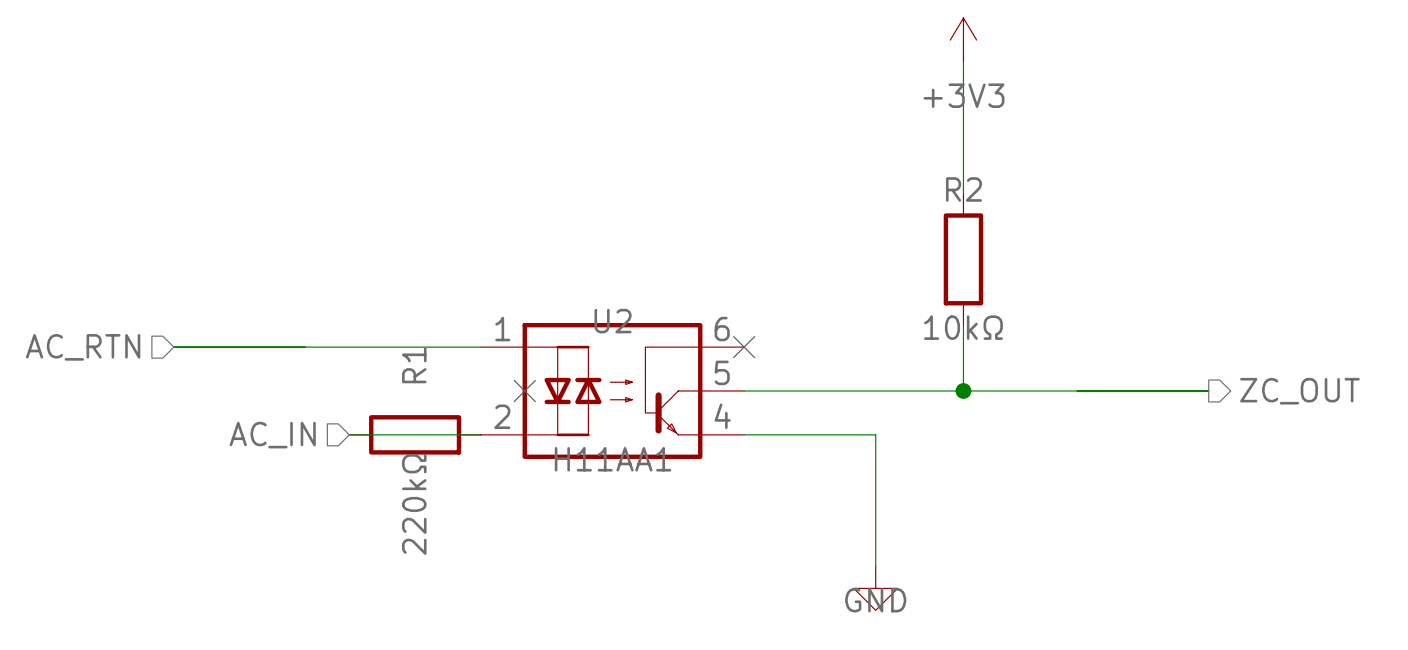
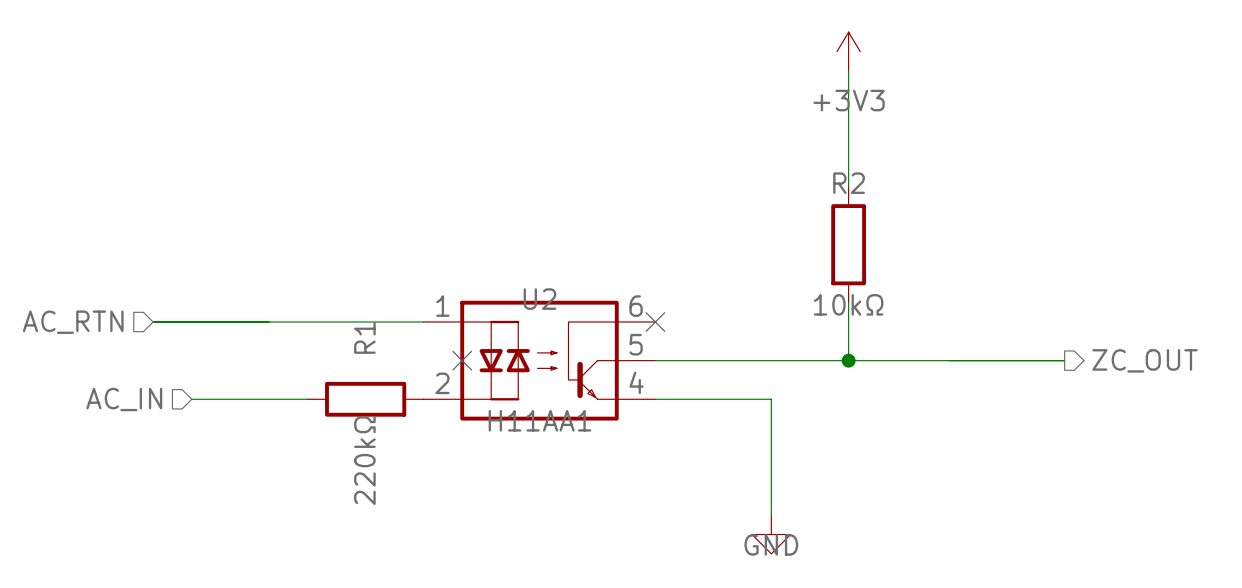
wire: (349, 434) (480, 434) -> (307, 399) (191, 399)
hierarchical label position: AC_IN (272, 435) -> AC_IN (124, 399)

